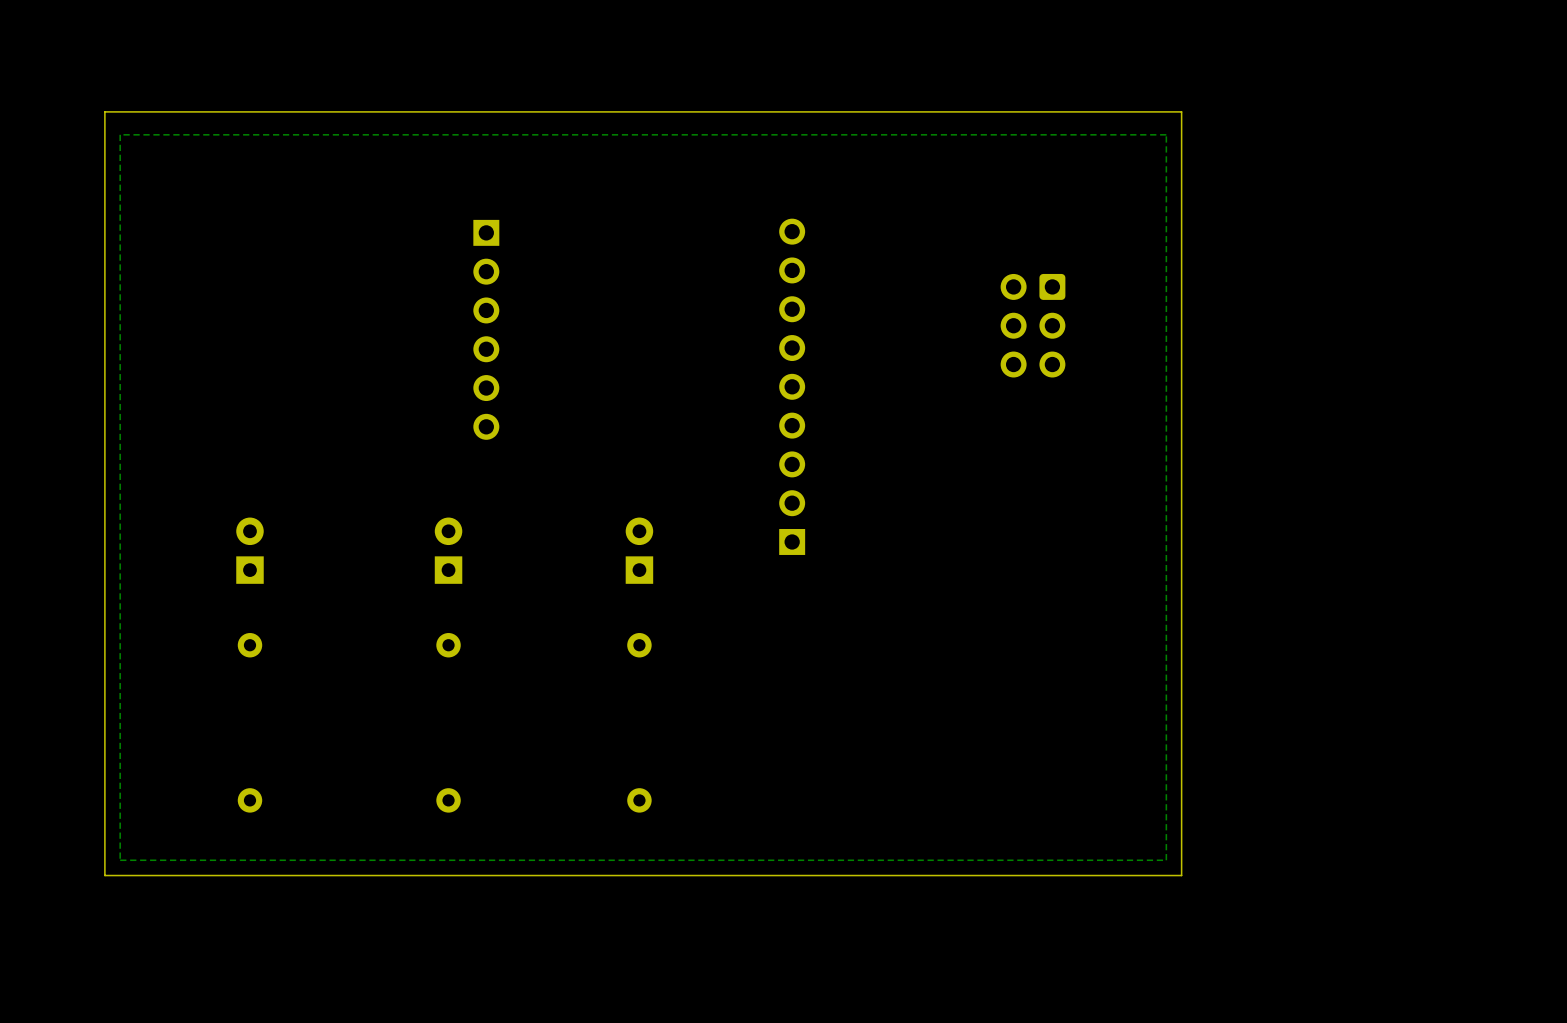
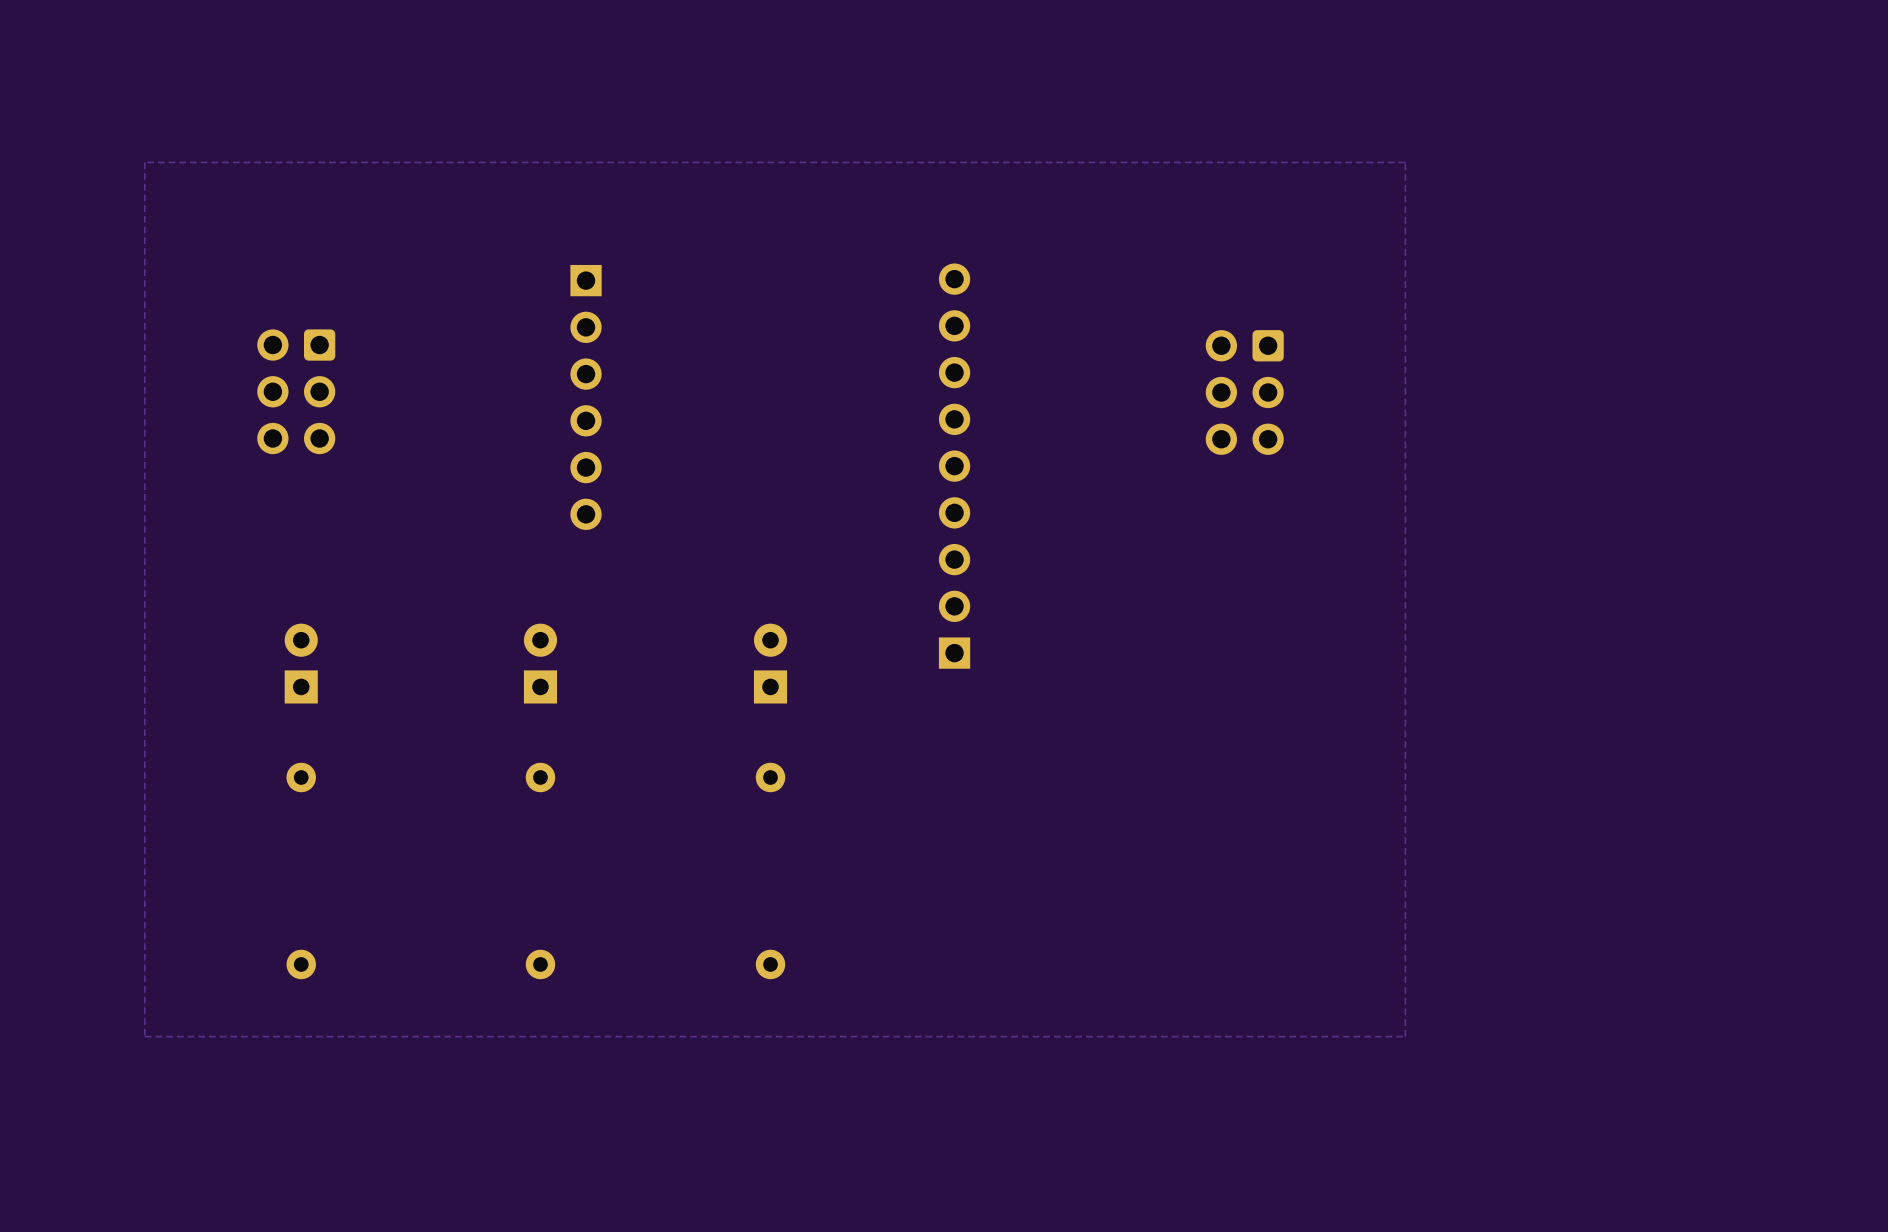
board edge: (1181, 111) (104, 111) (104, 875) (1181, 875) (1181, 111) -> none
part: none -> (296, 391)

